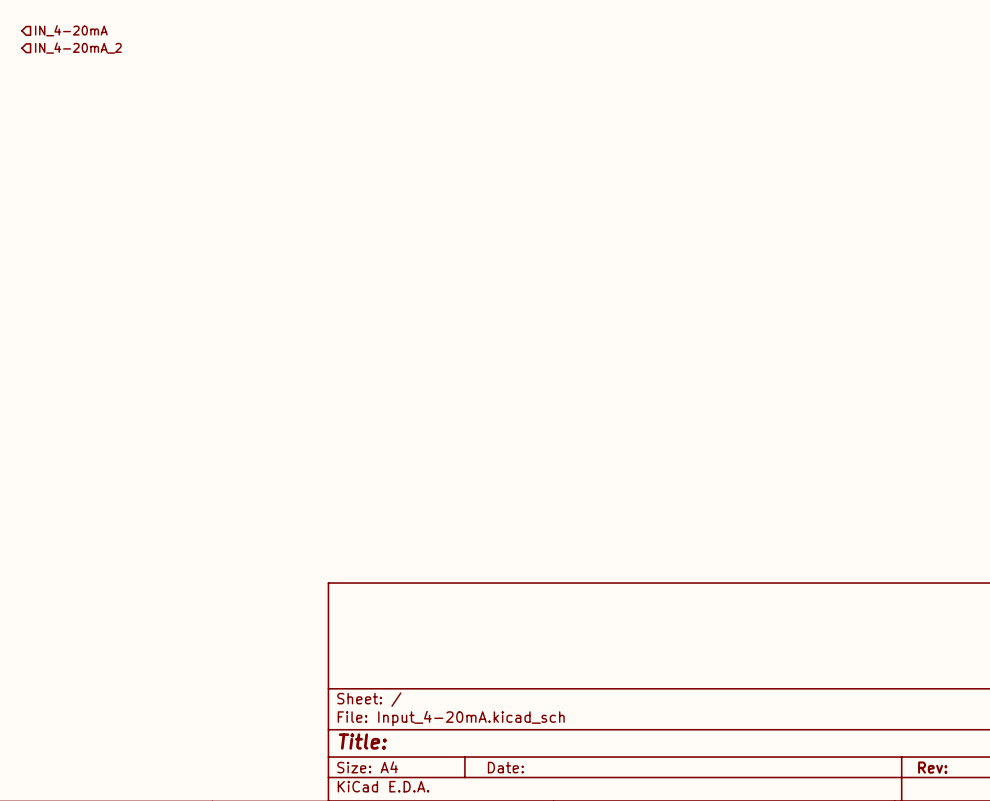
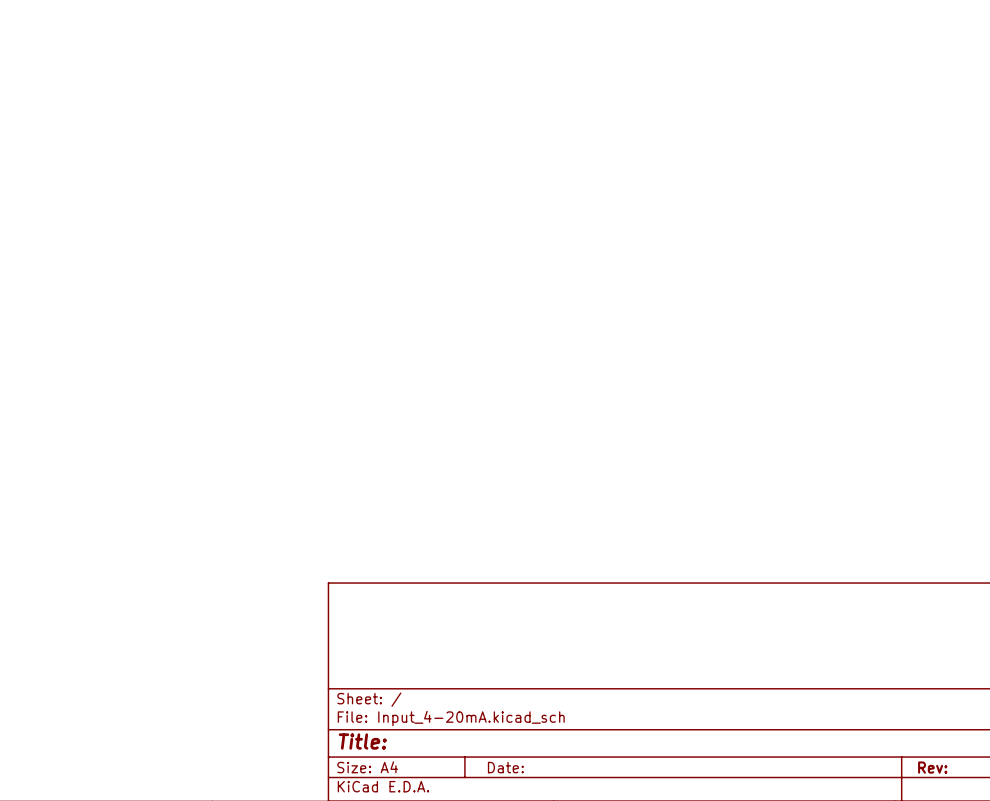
hierarchical label: IN_4-20mA (71, 30) -> none
hierarchical label: IN_4-20mA_2 (78, 48) -> none

